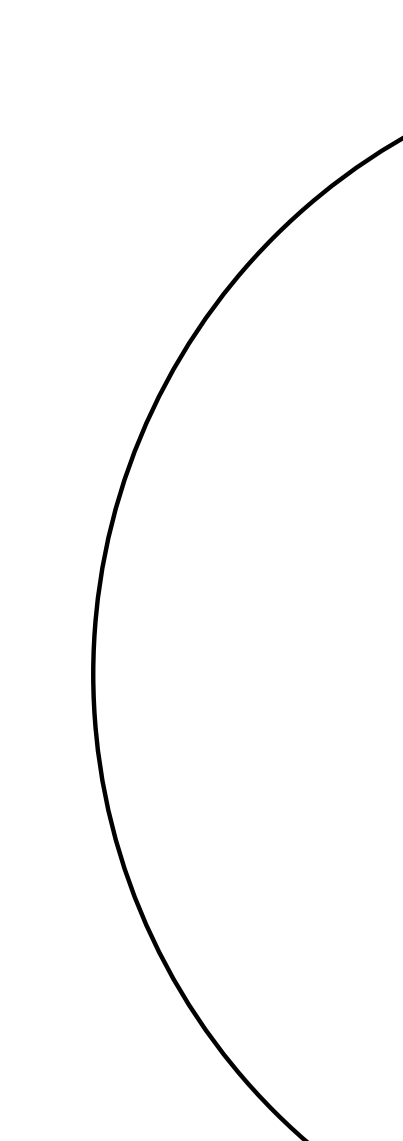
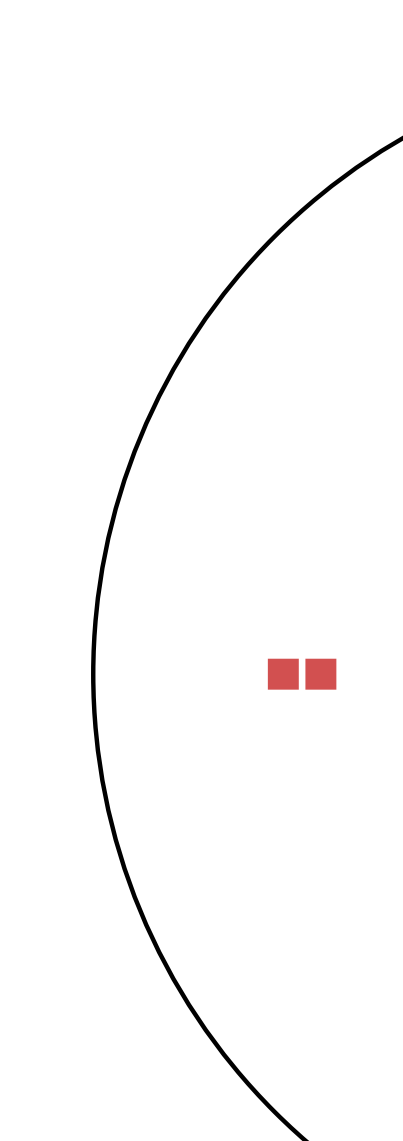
part: none -> (302, 674)

